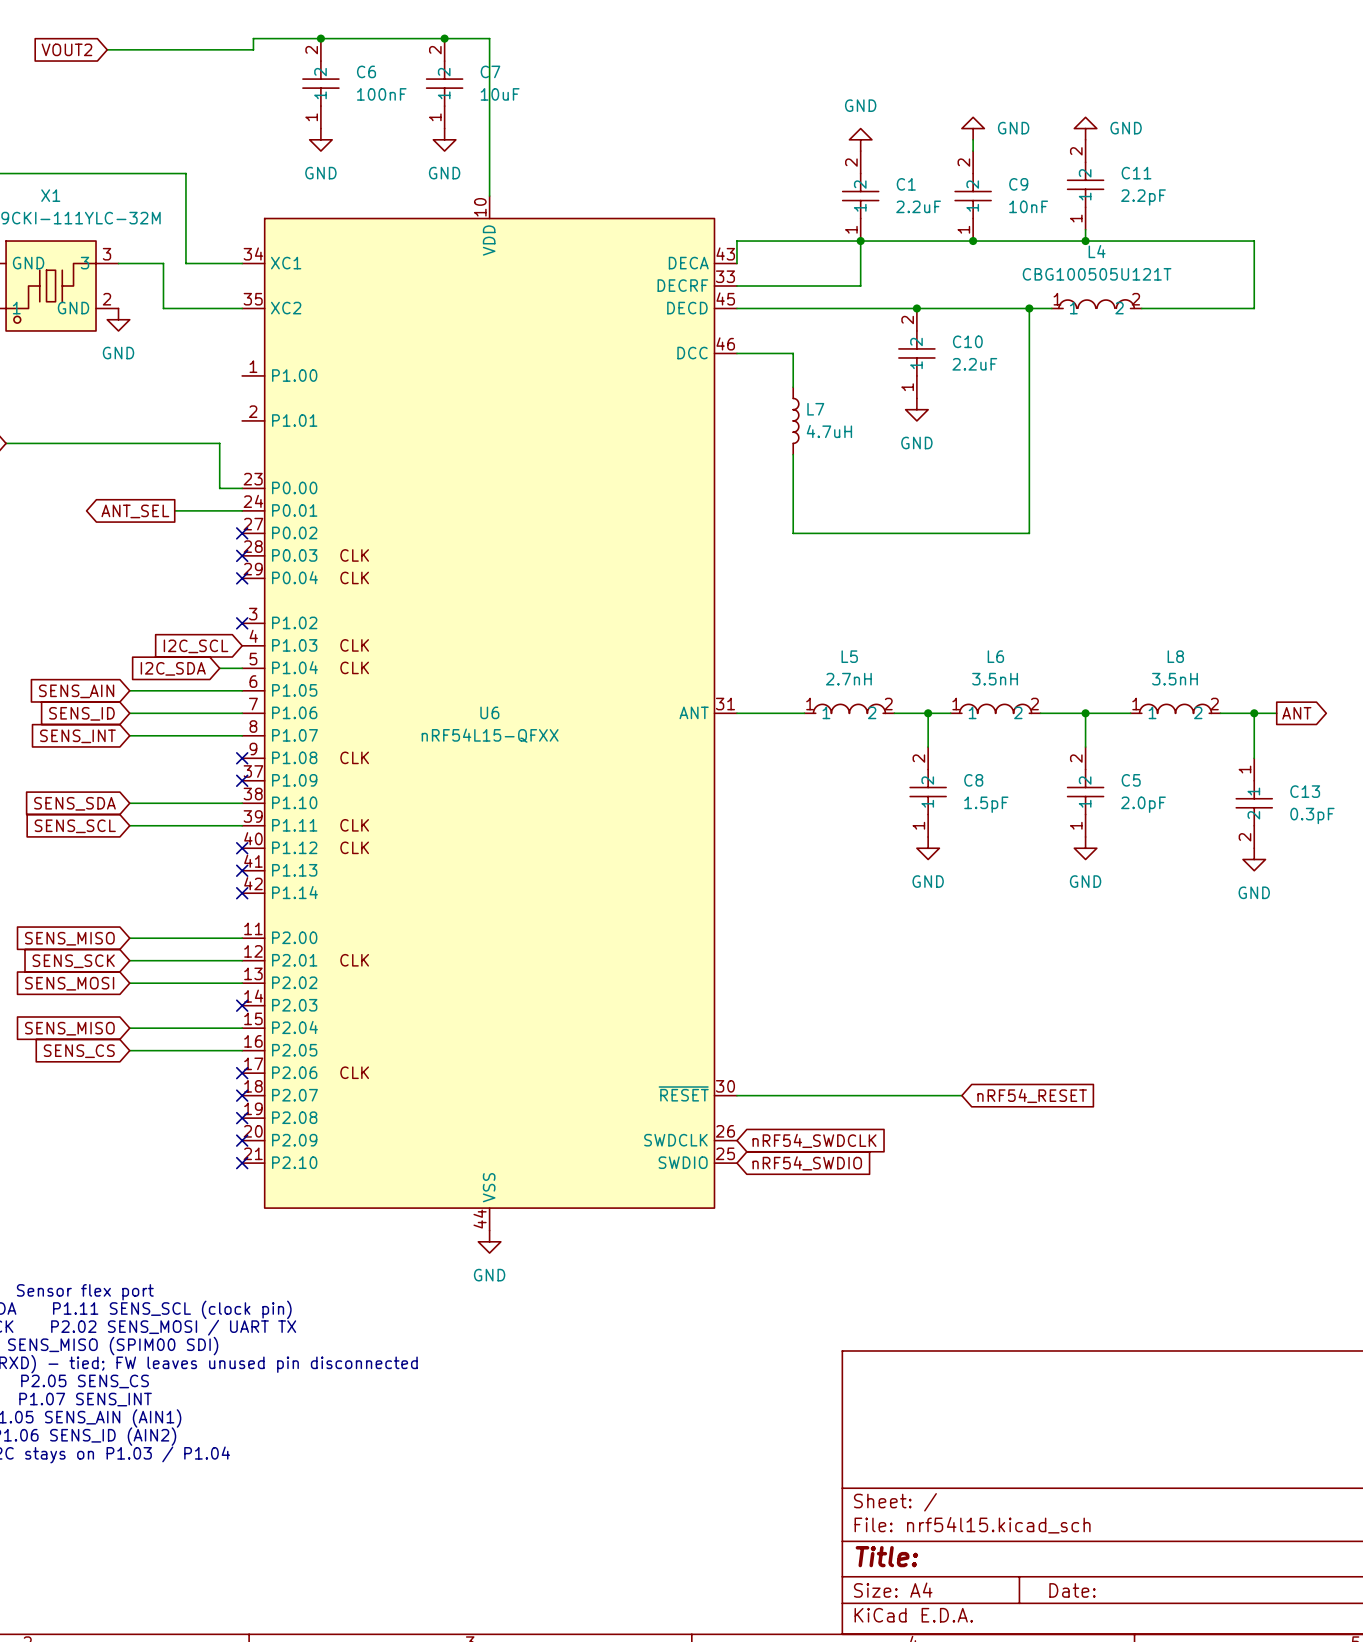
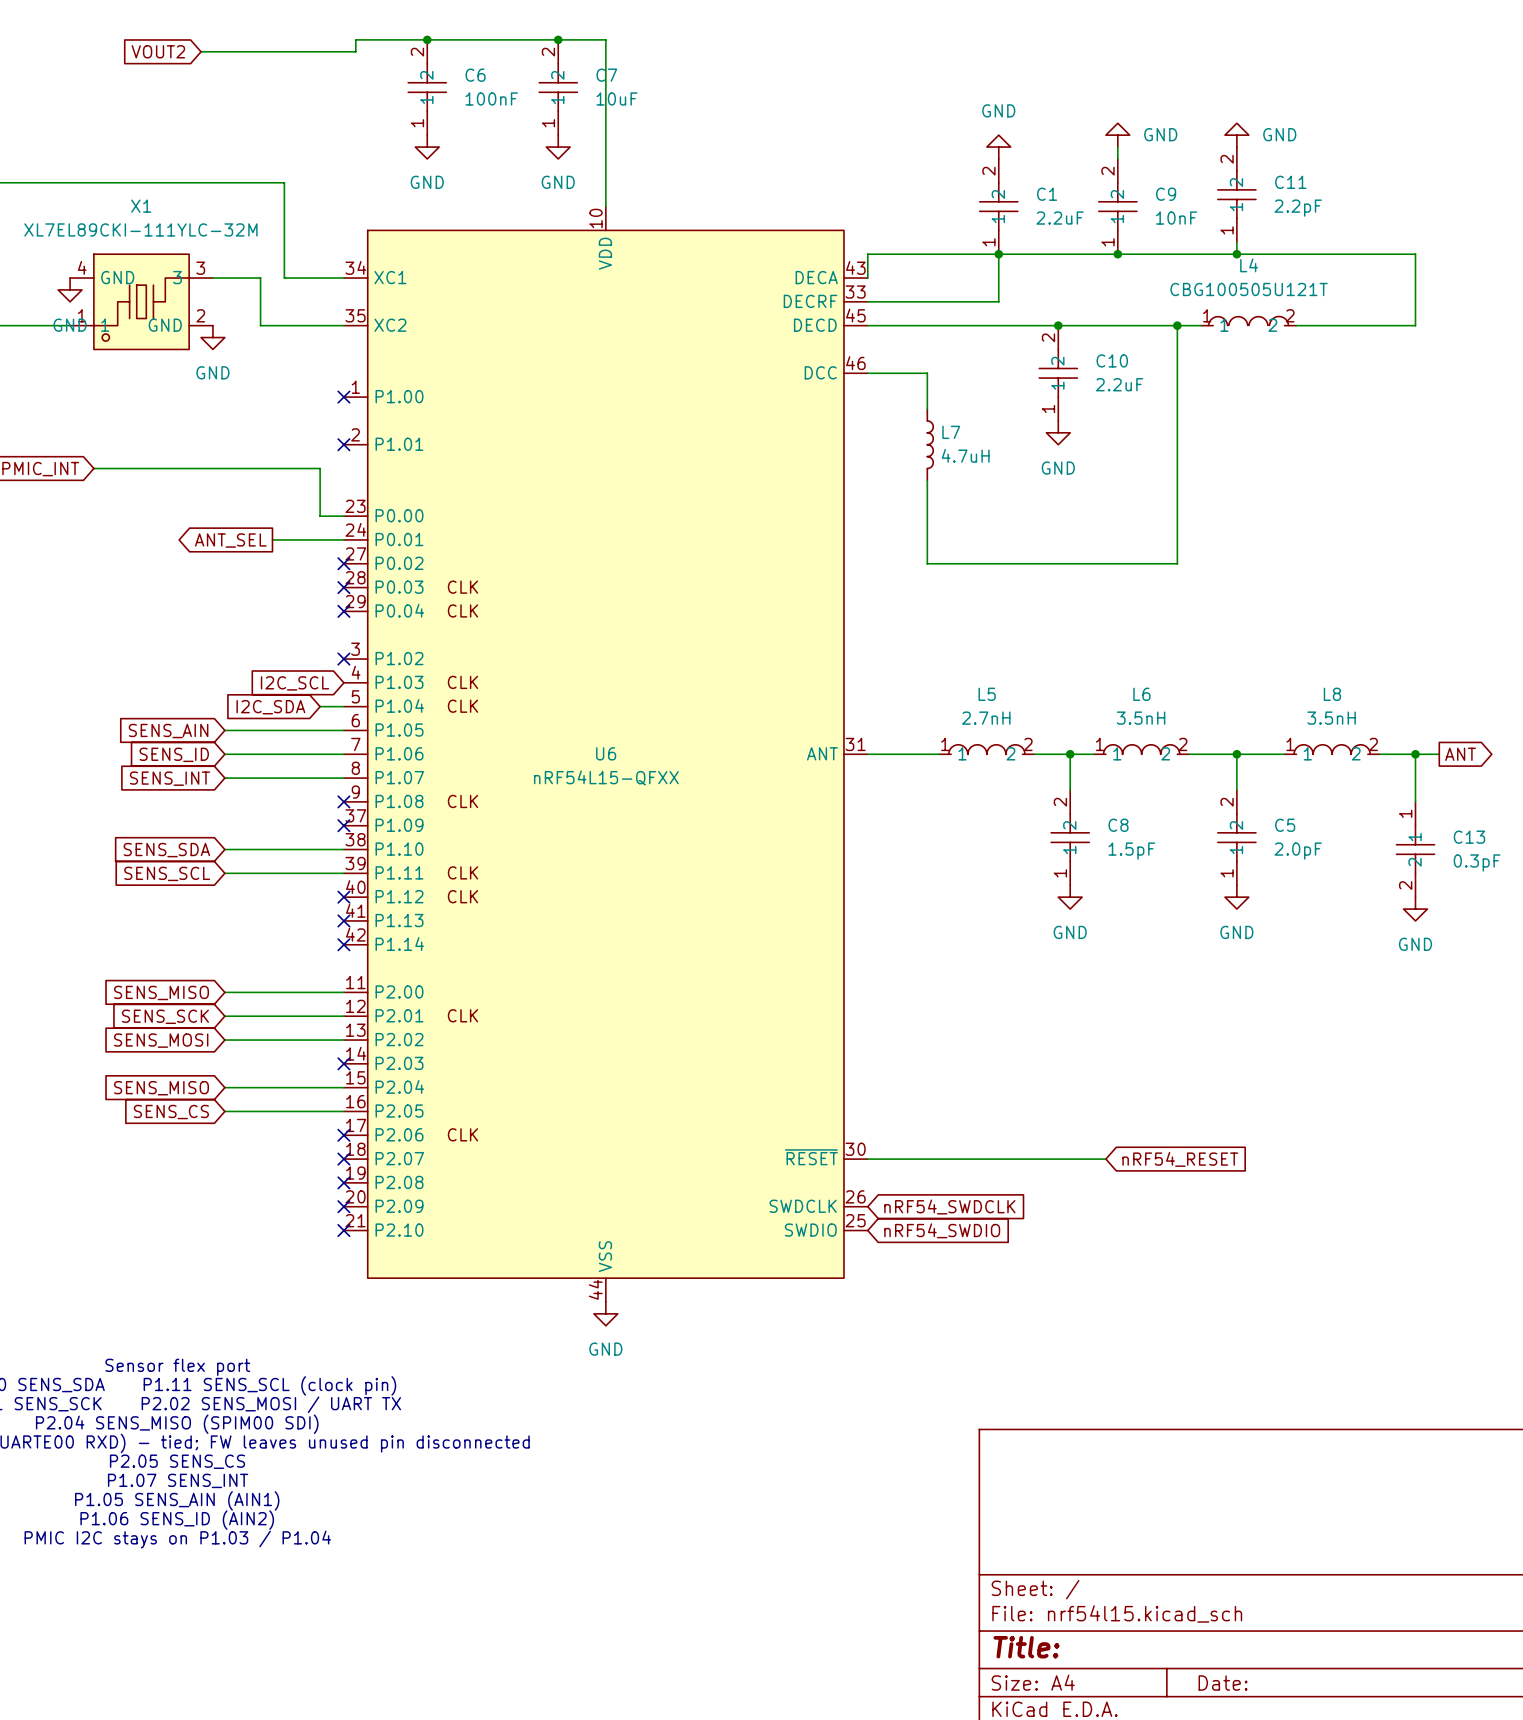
no-connect mark: none -> (343, 397)
no-connect mark: none -> (343, 444)

